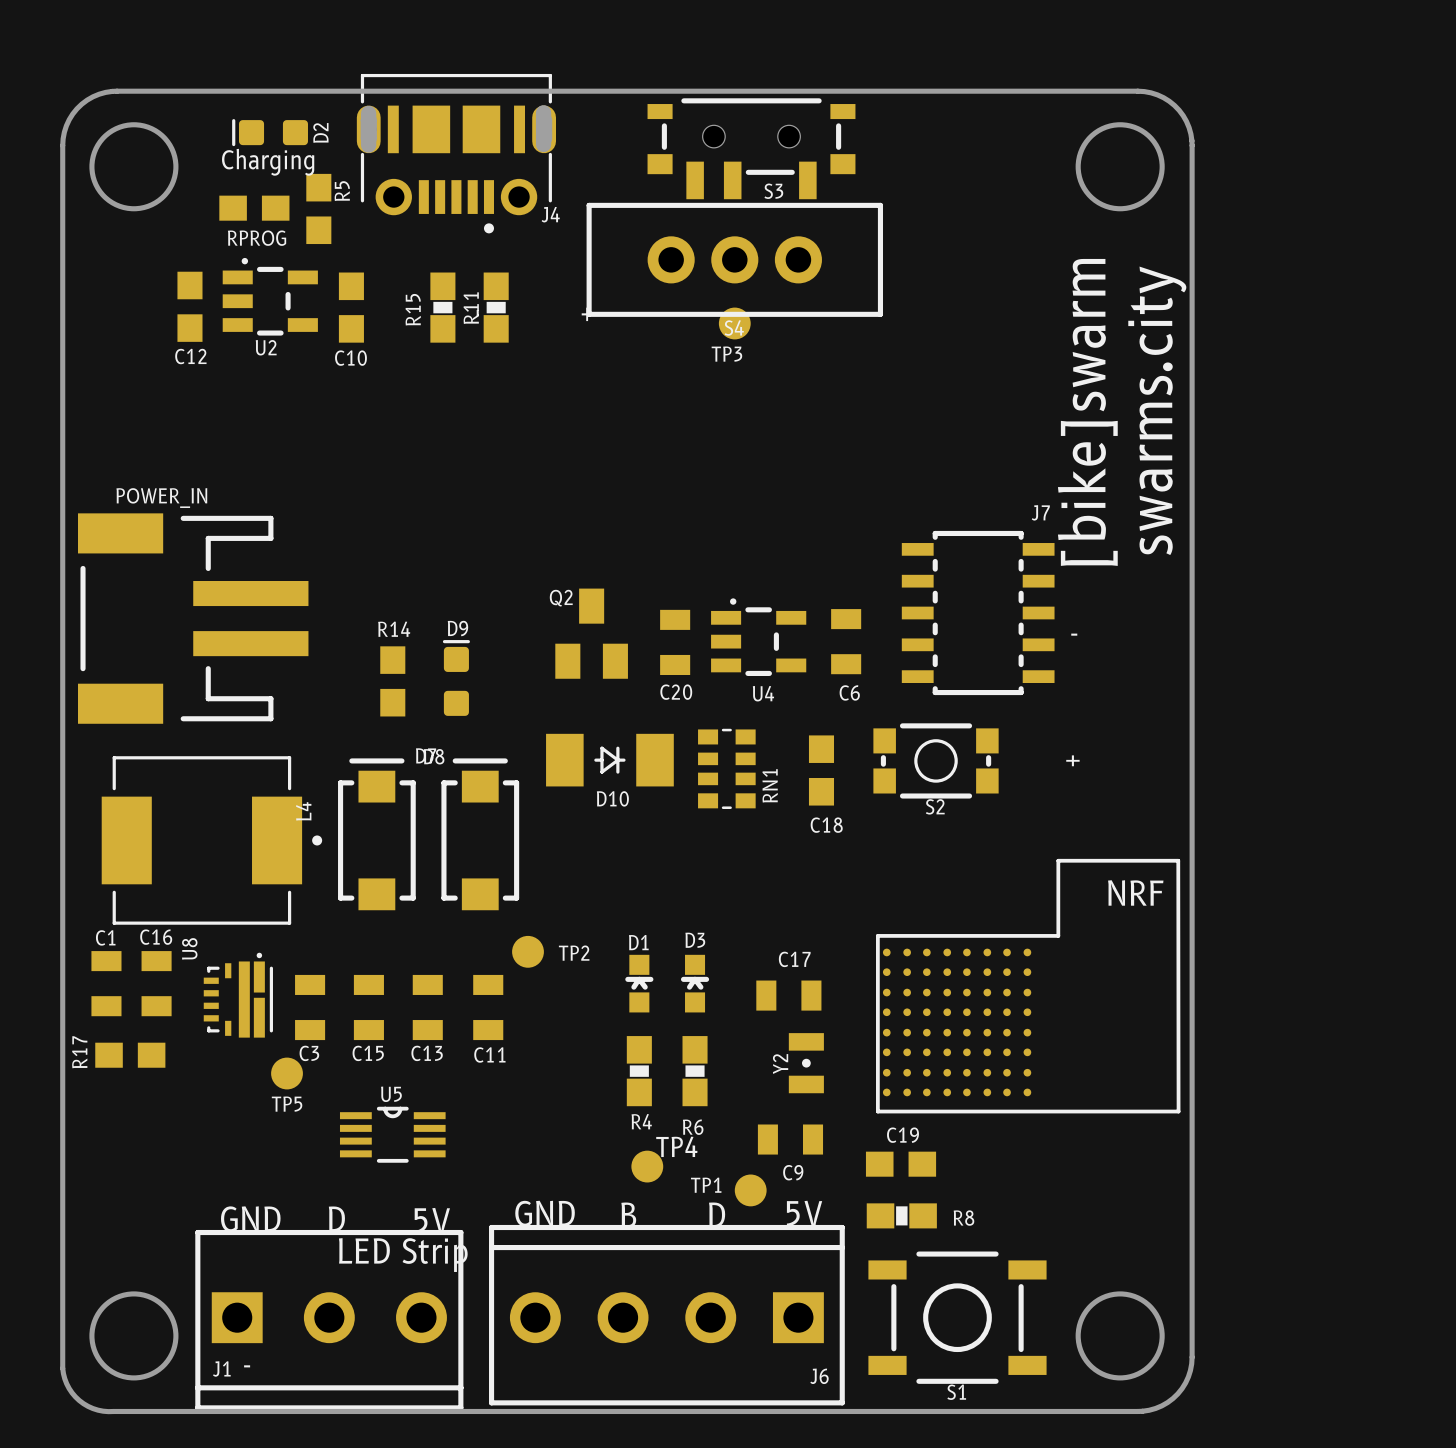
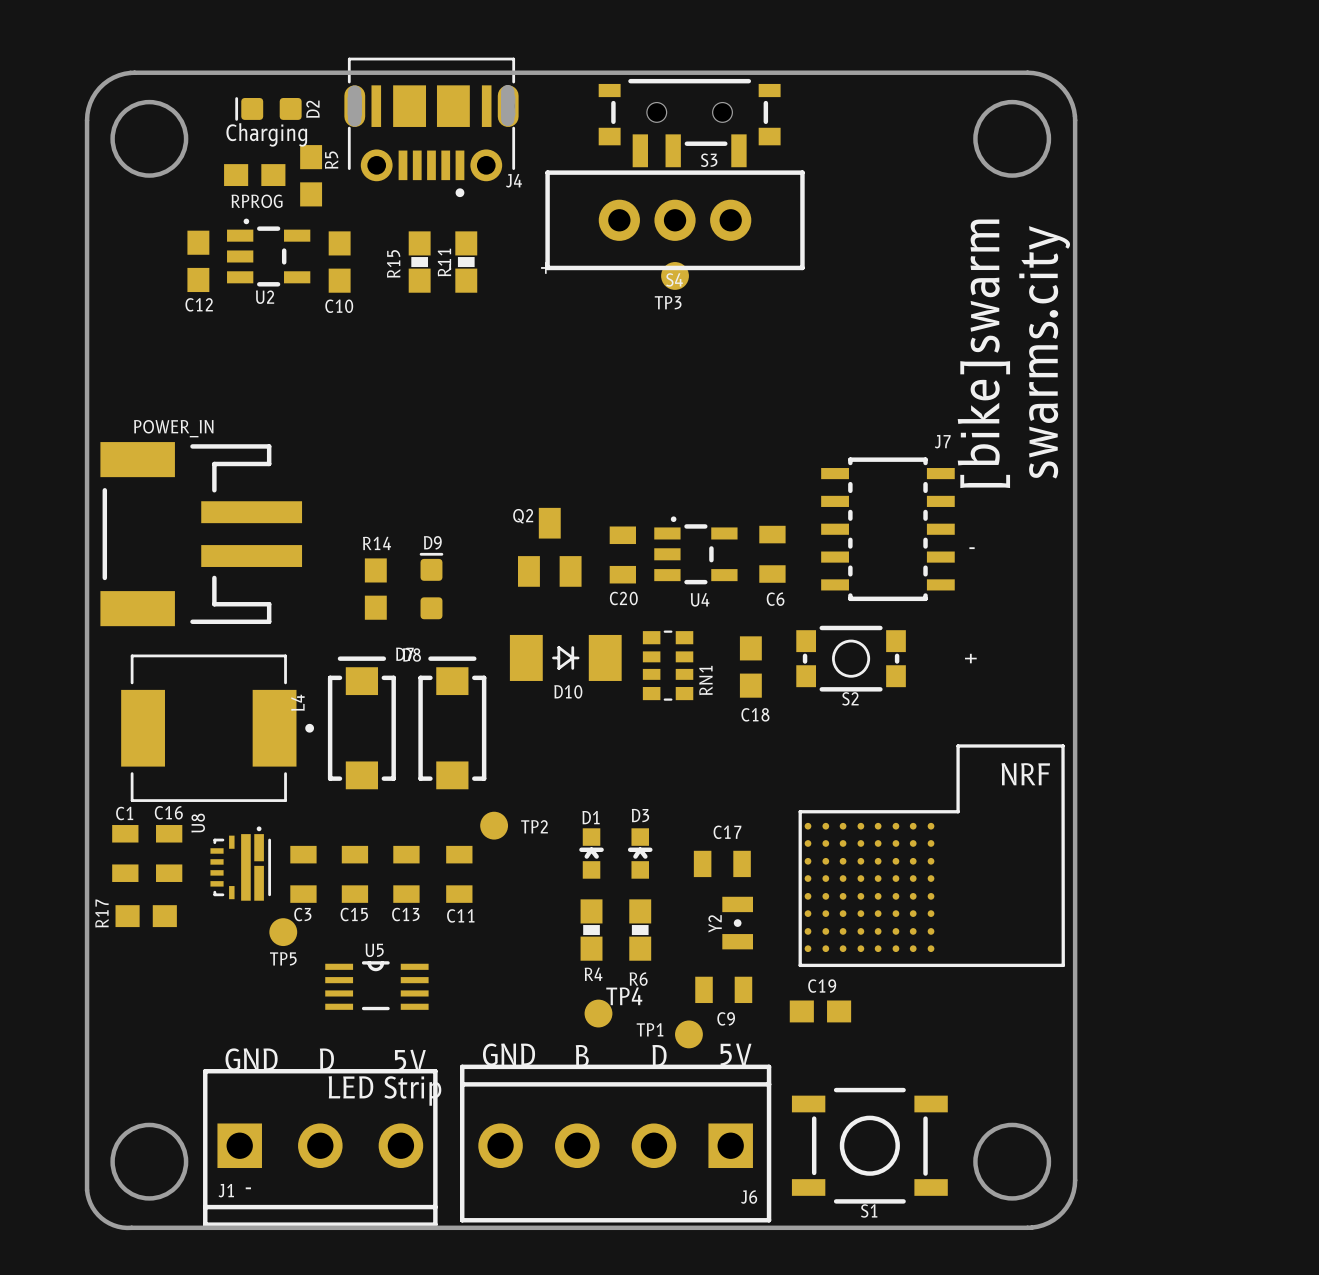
U5 footprint: [339, 1106, 446, 1163] -> [325, 961, 429, 1011]
R8: (901, 1215) -> none

